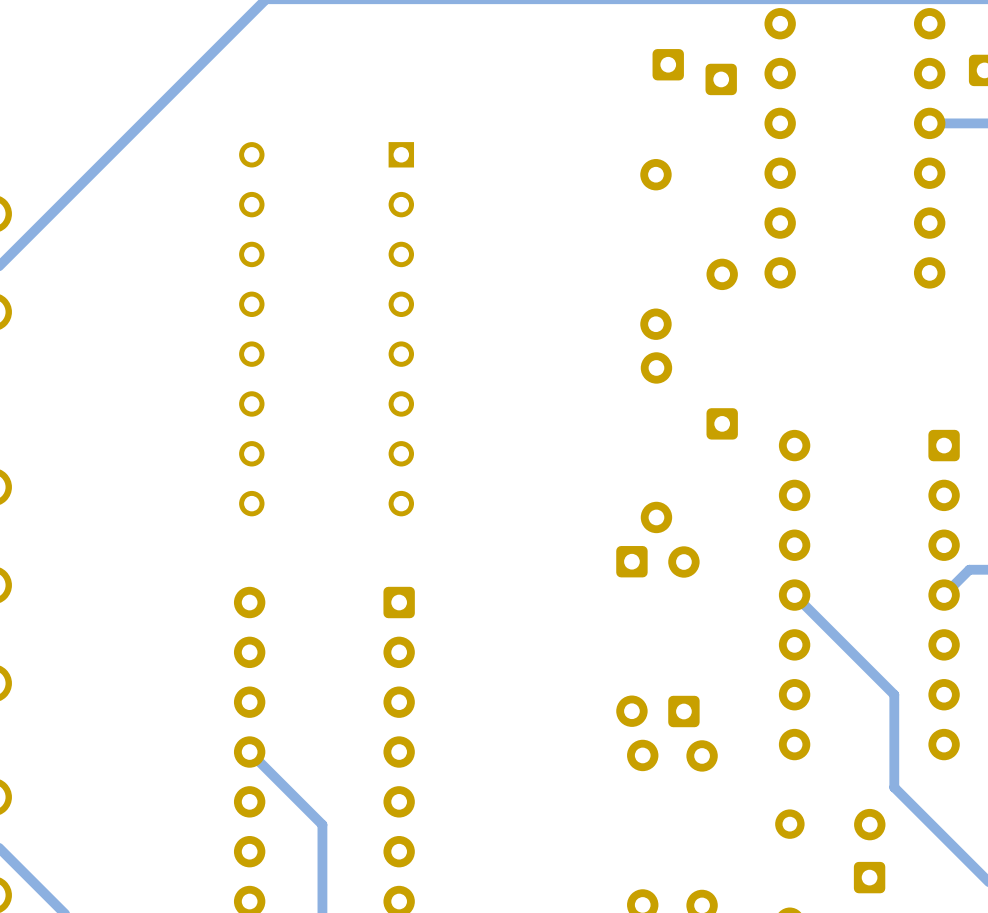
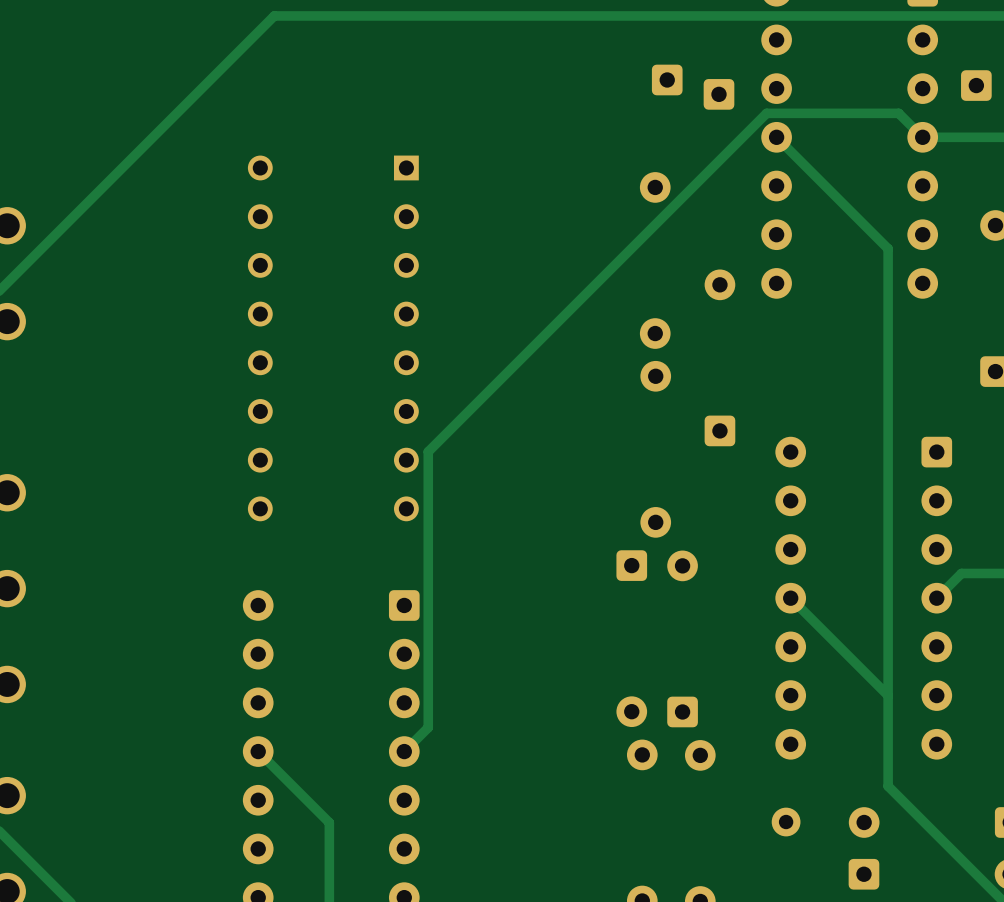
track: none -> (776, 137) (888, 248) (888, 695)
track: none -> (922, 137) (898, 113) (766, 113) (428, 451) (428, 727) (404, 751)

